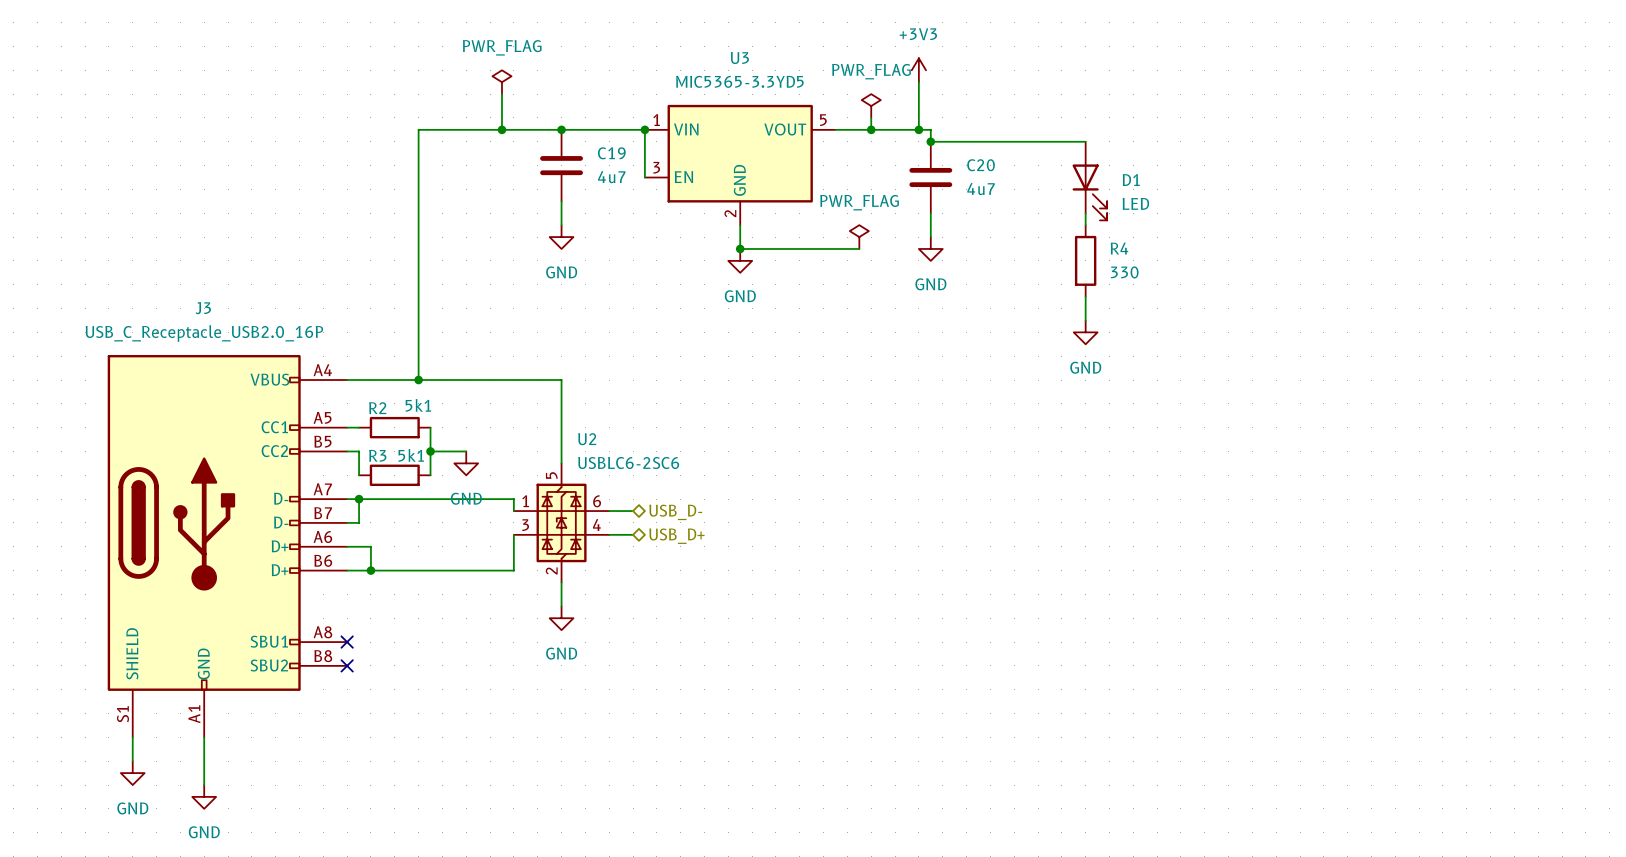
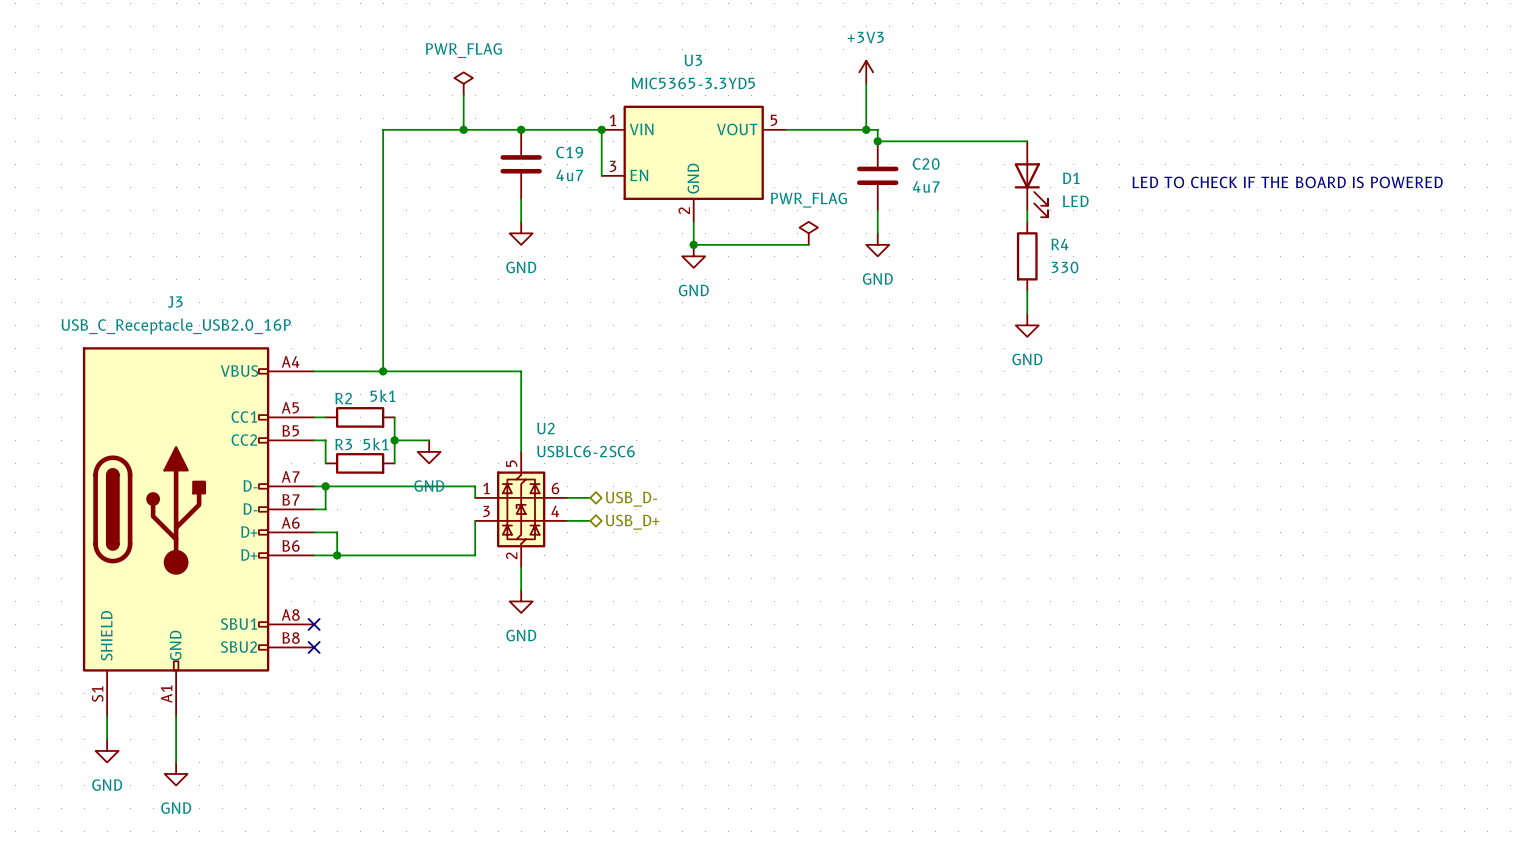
power symbol: PWR_FLAG (871, 106) -> none
wire: (871, 117) (871, 129) -> none
junction: (871, 129) -> none
text: none -> LED TO CHECK IF THE BOARD IS POWERED (1287, 182)

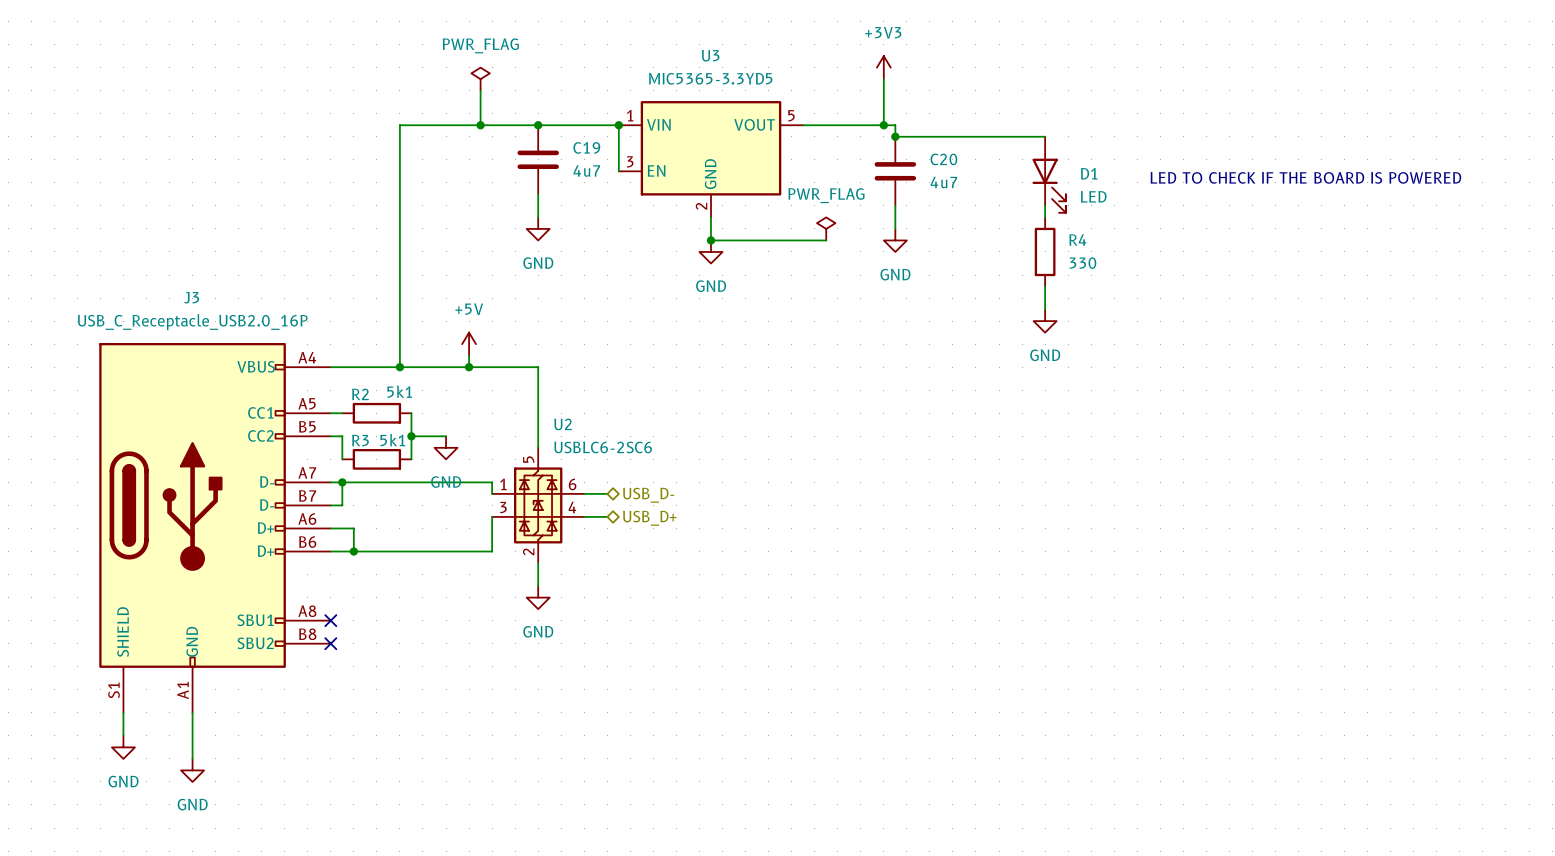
power symbol: none -> +5V (469, 344)
wire: none -> (469, 355) (469, 367)
junction: none -> (469, 367)

